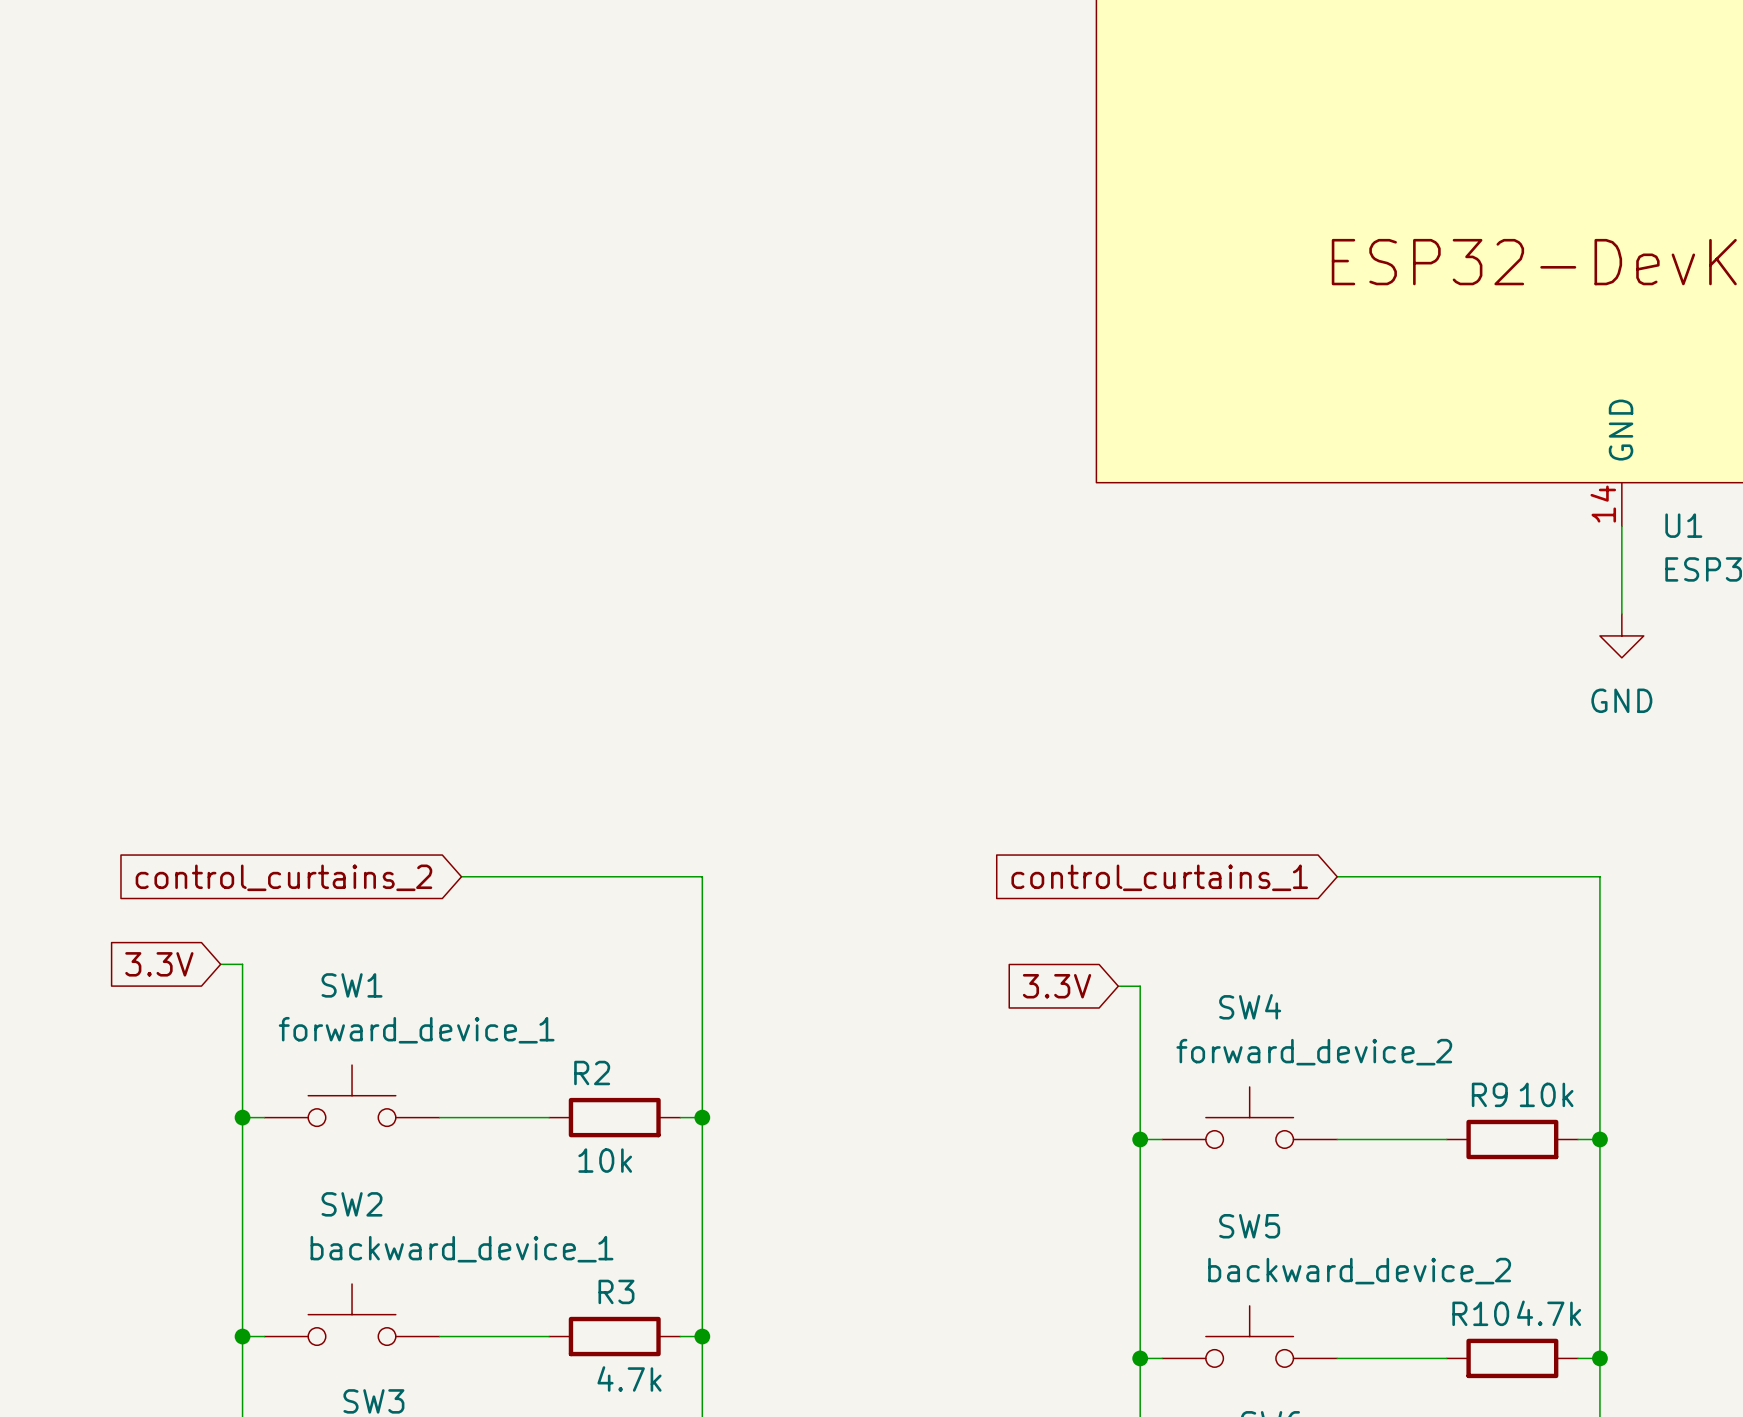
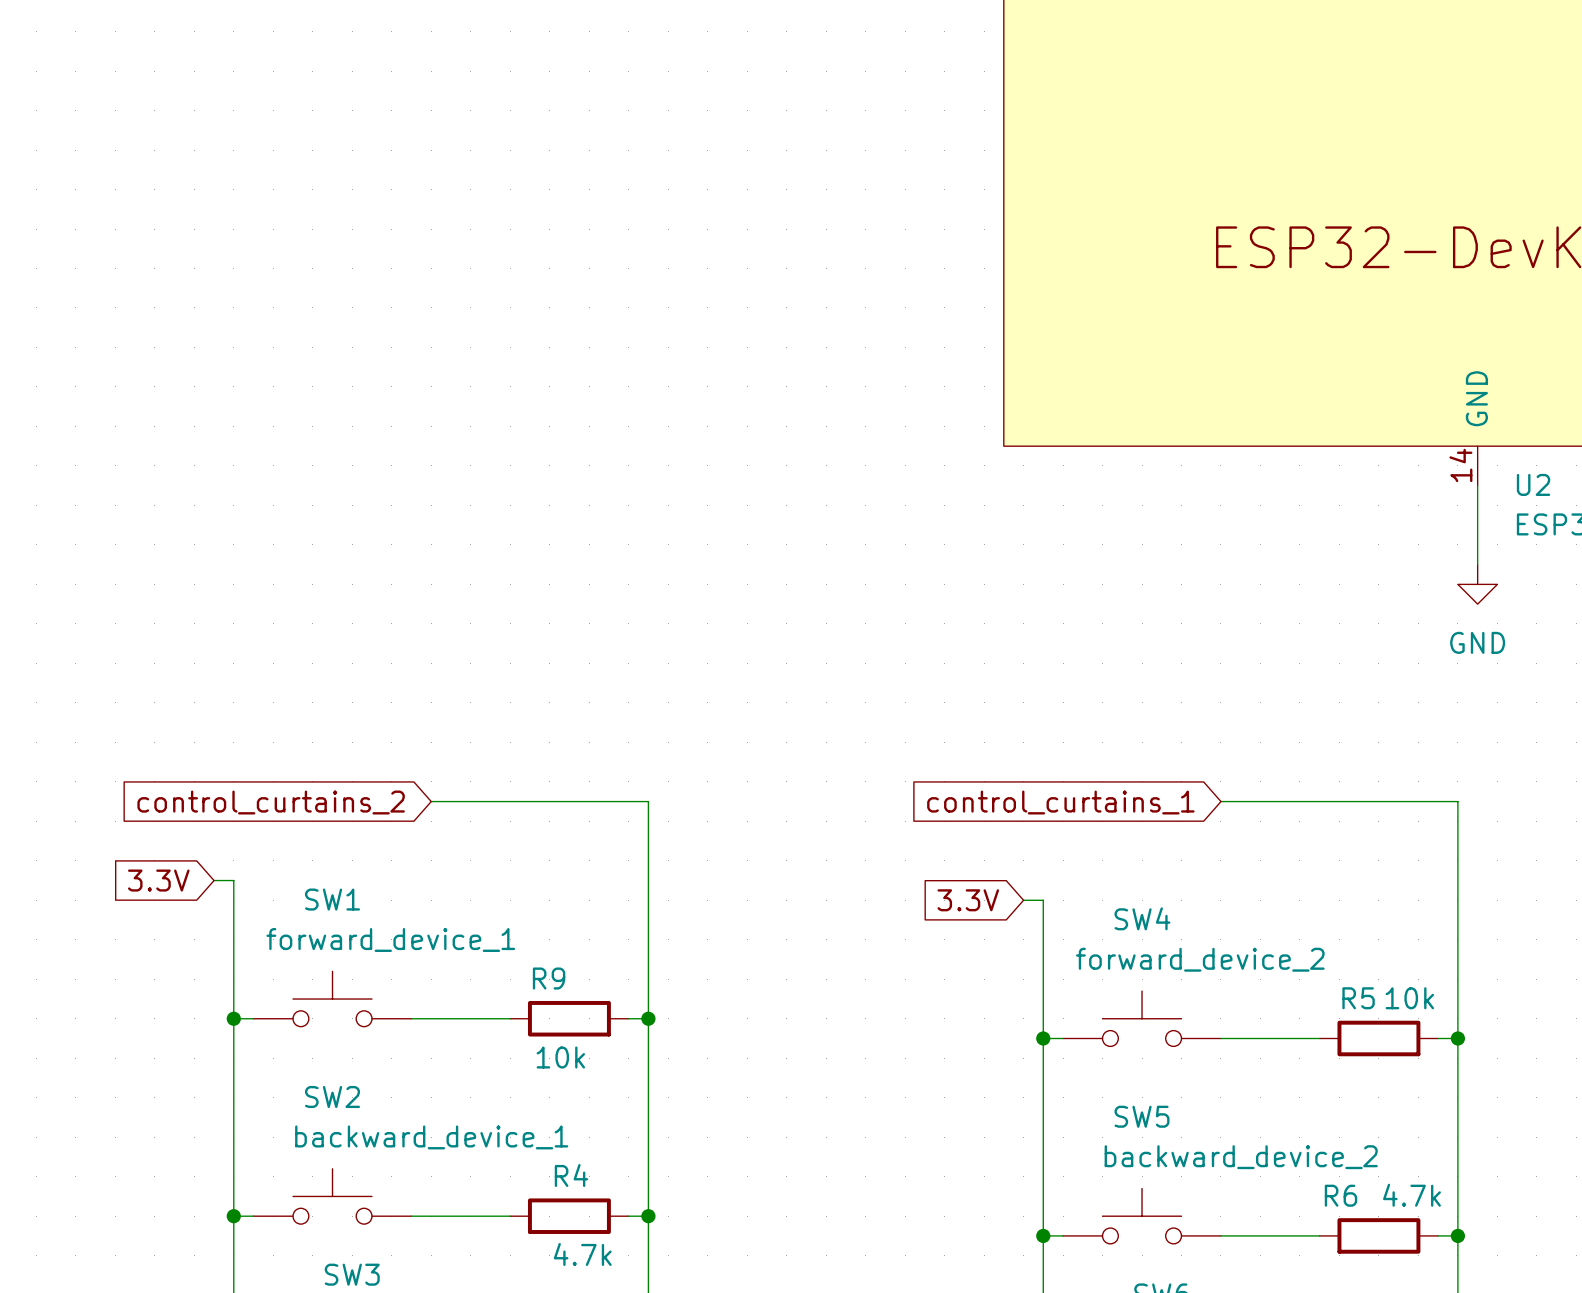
U1 name: U1 (1683, 525) -> U2 (1533, 484)
R2 name: R2 (592, 1073) -> R9 (549, 978)
R9 name: R9 (1489, 1094) -> R5 (1358, 998)
R3 name: R3 (616, 1291) -> R4 (571, 1175)
R10 name: R10 (1480, 1313) -> R6 (1341, 1195)

